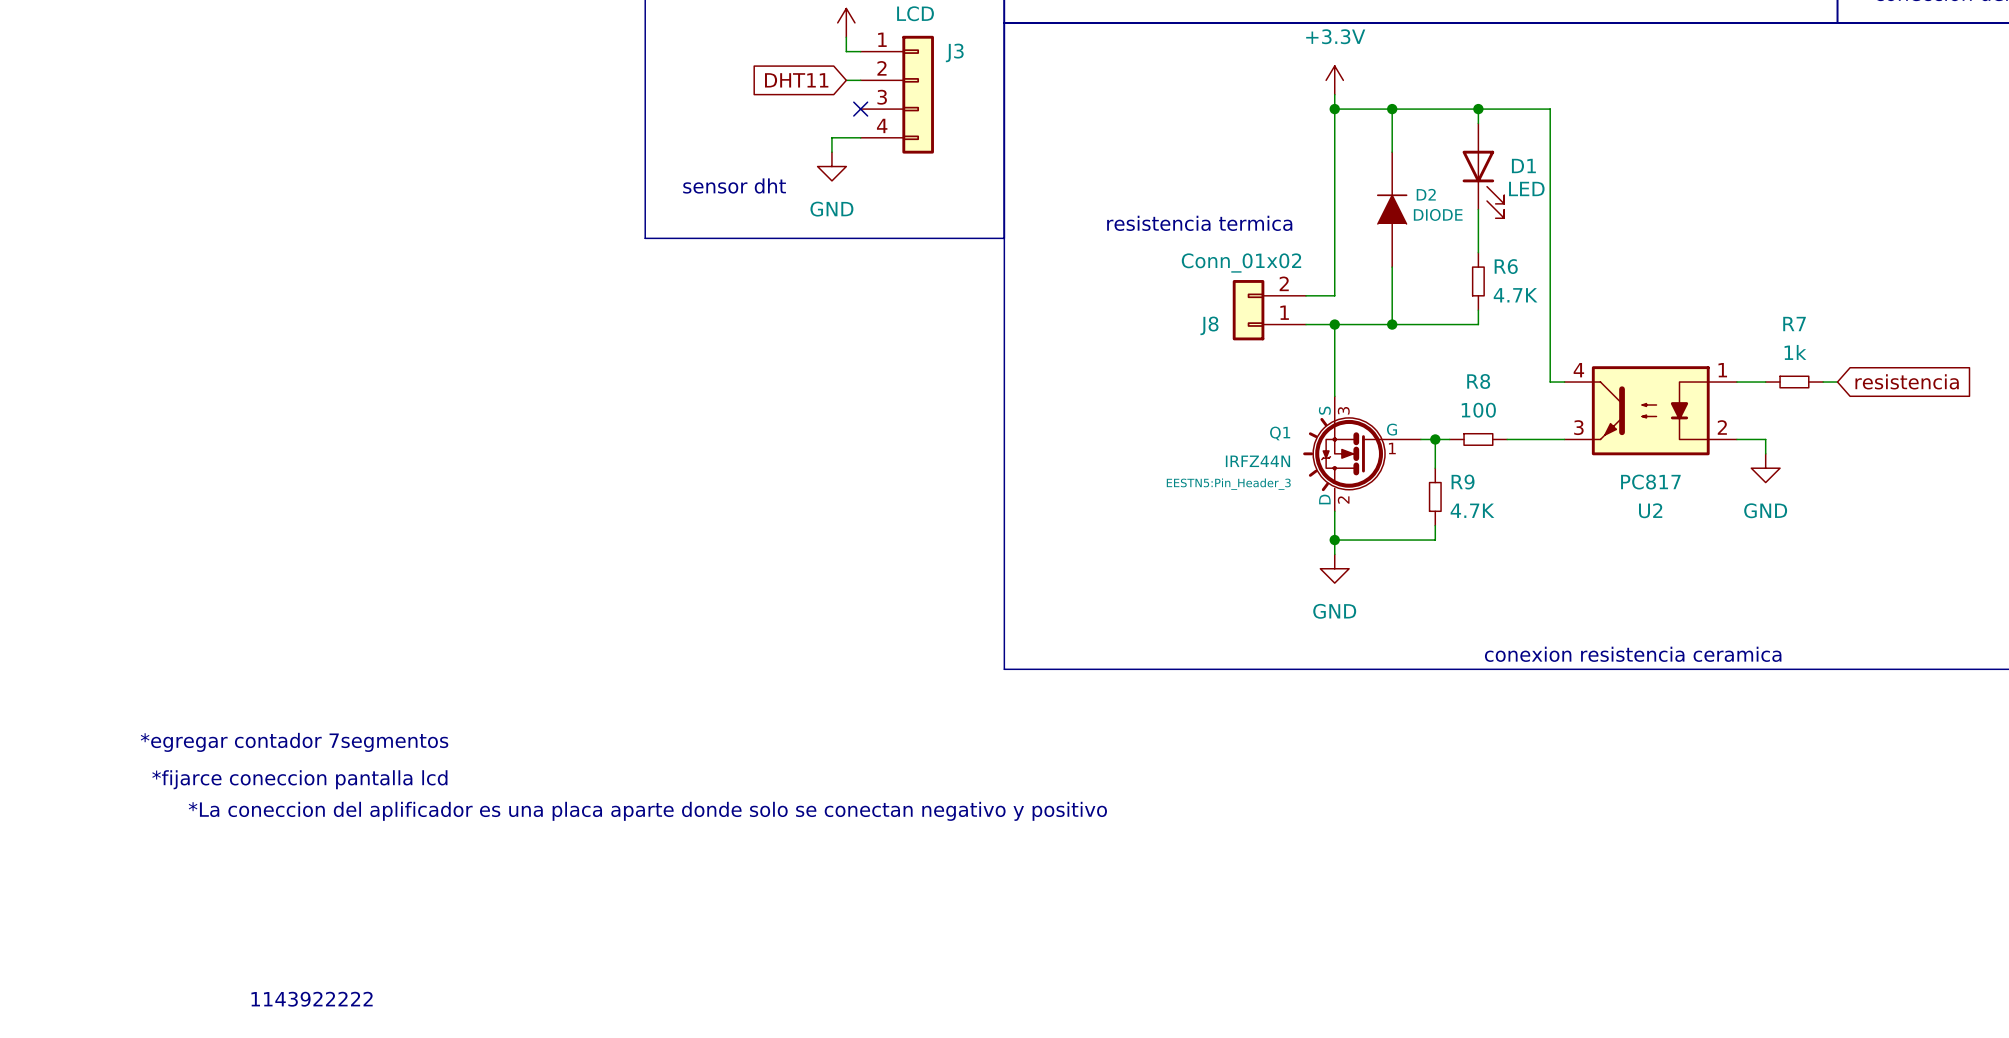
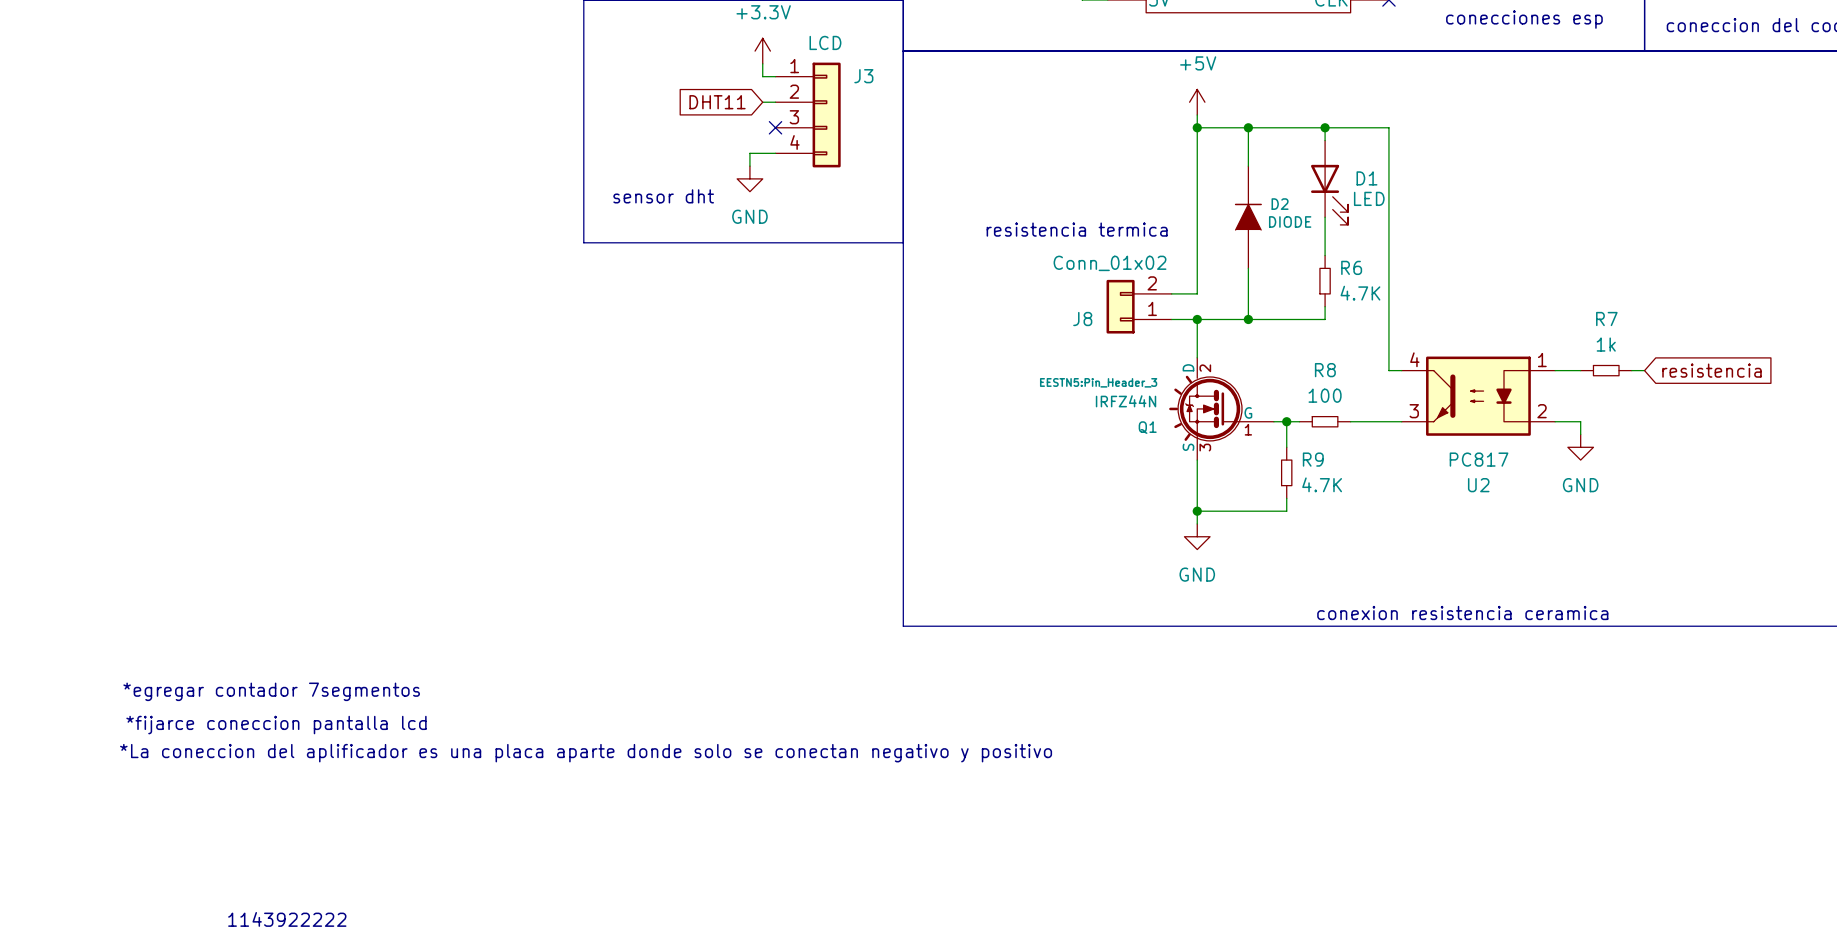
power symbol: +3.3V (1334, 80) -> +5V (1197, 102)
Q1 flip: as is (1344, 454) -> up-down (1205, 408)

